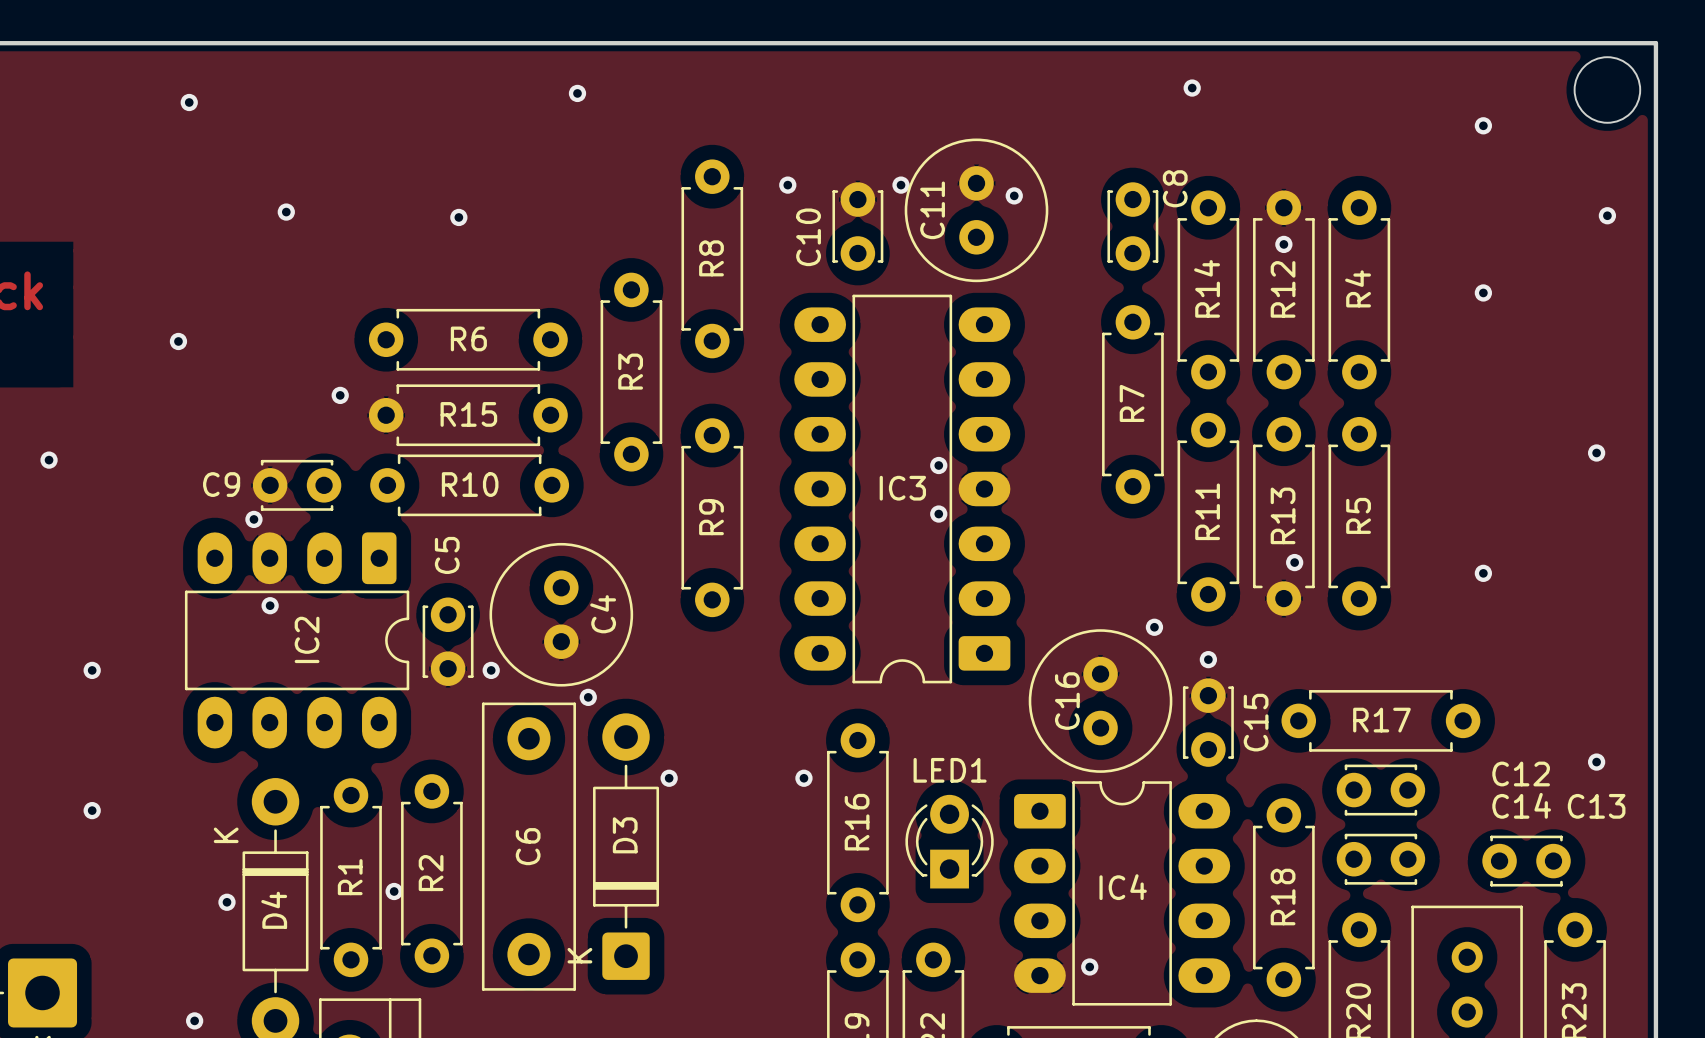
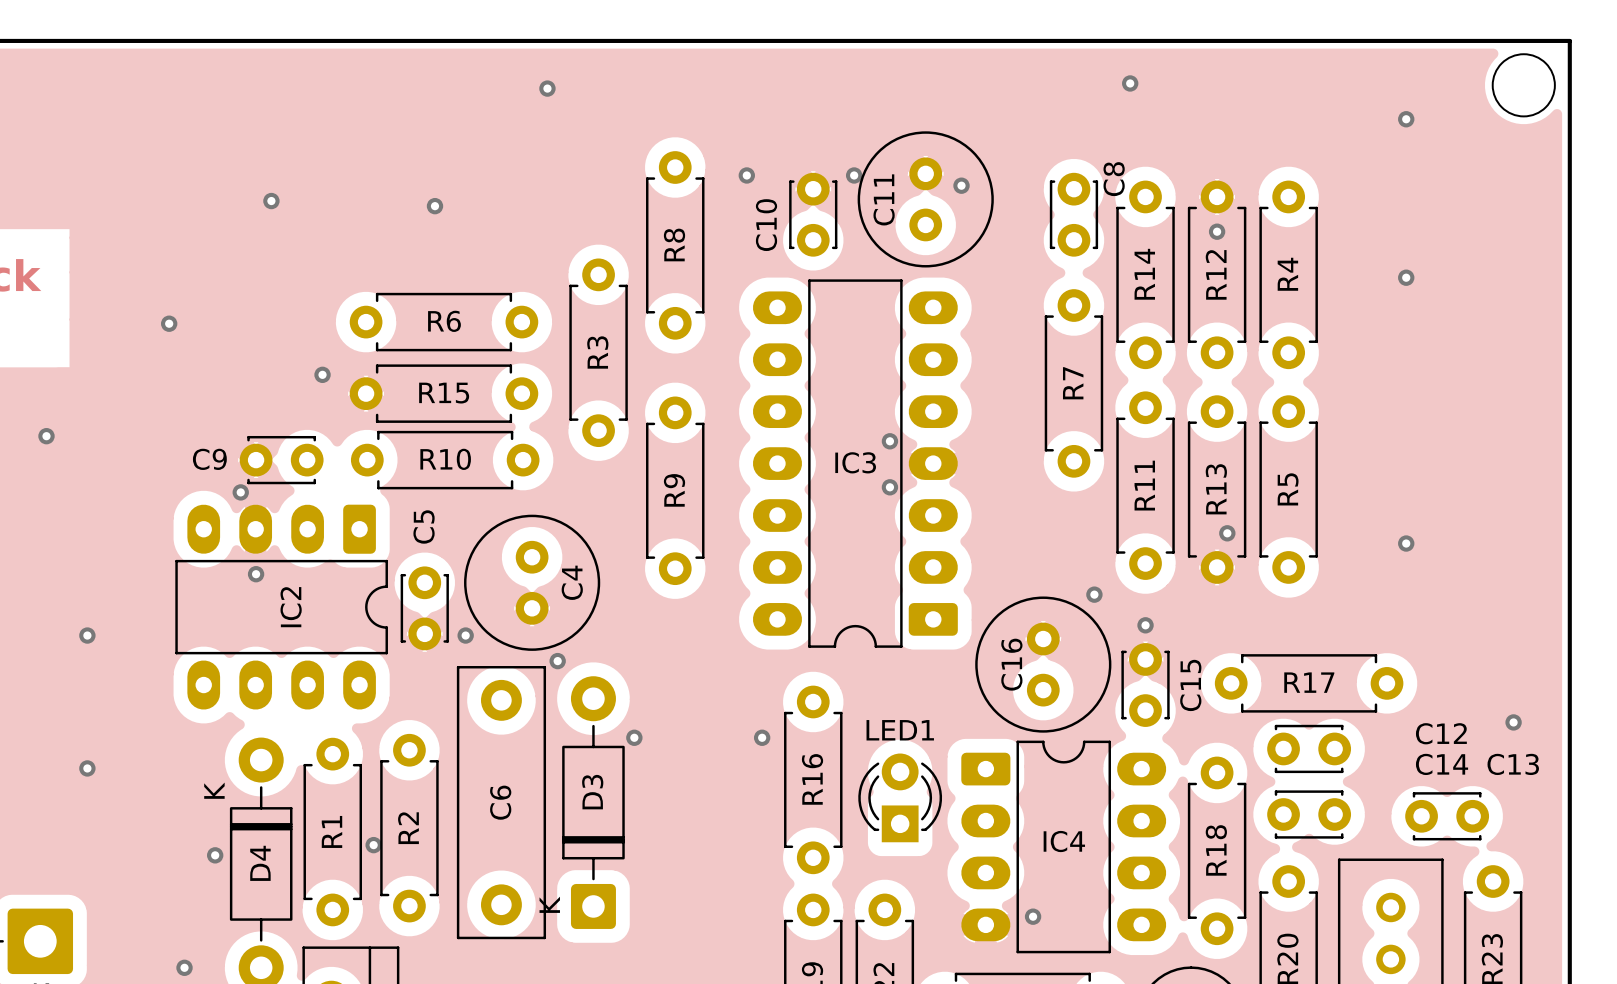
via: (189, 102) -> none
via: (1607, 215) -> none
via: (1596, 452) -> none

